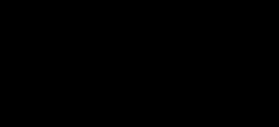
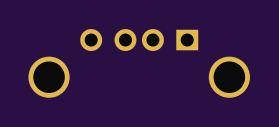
part: none -> (139, 63)

